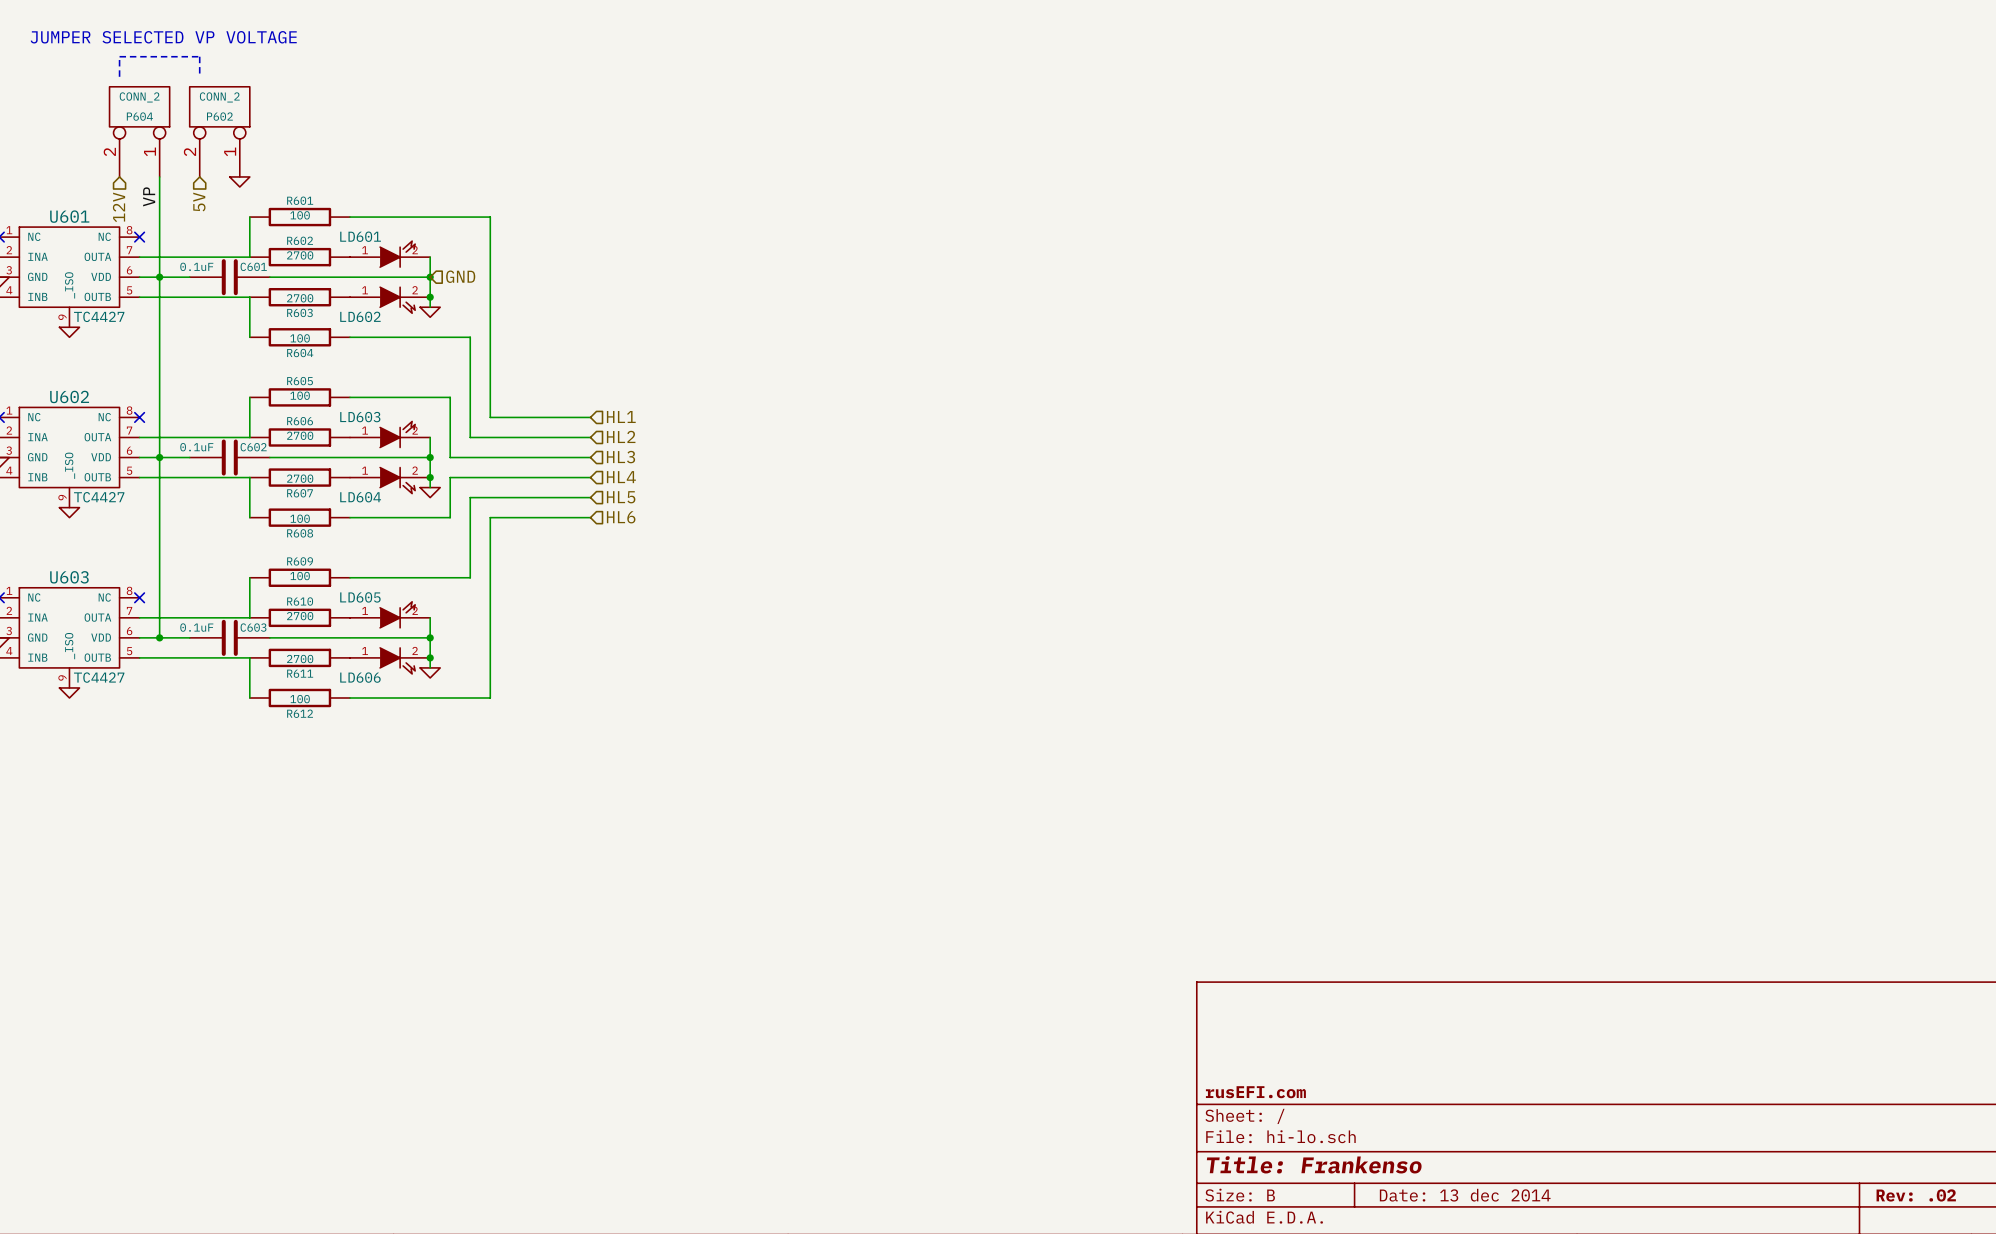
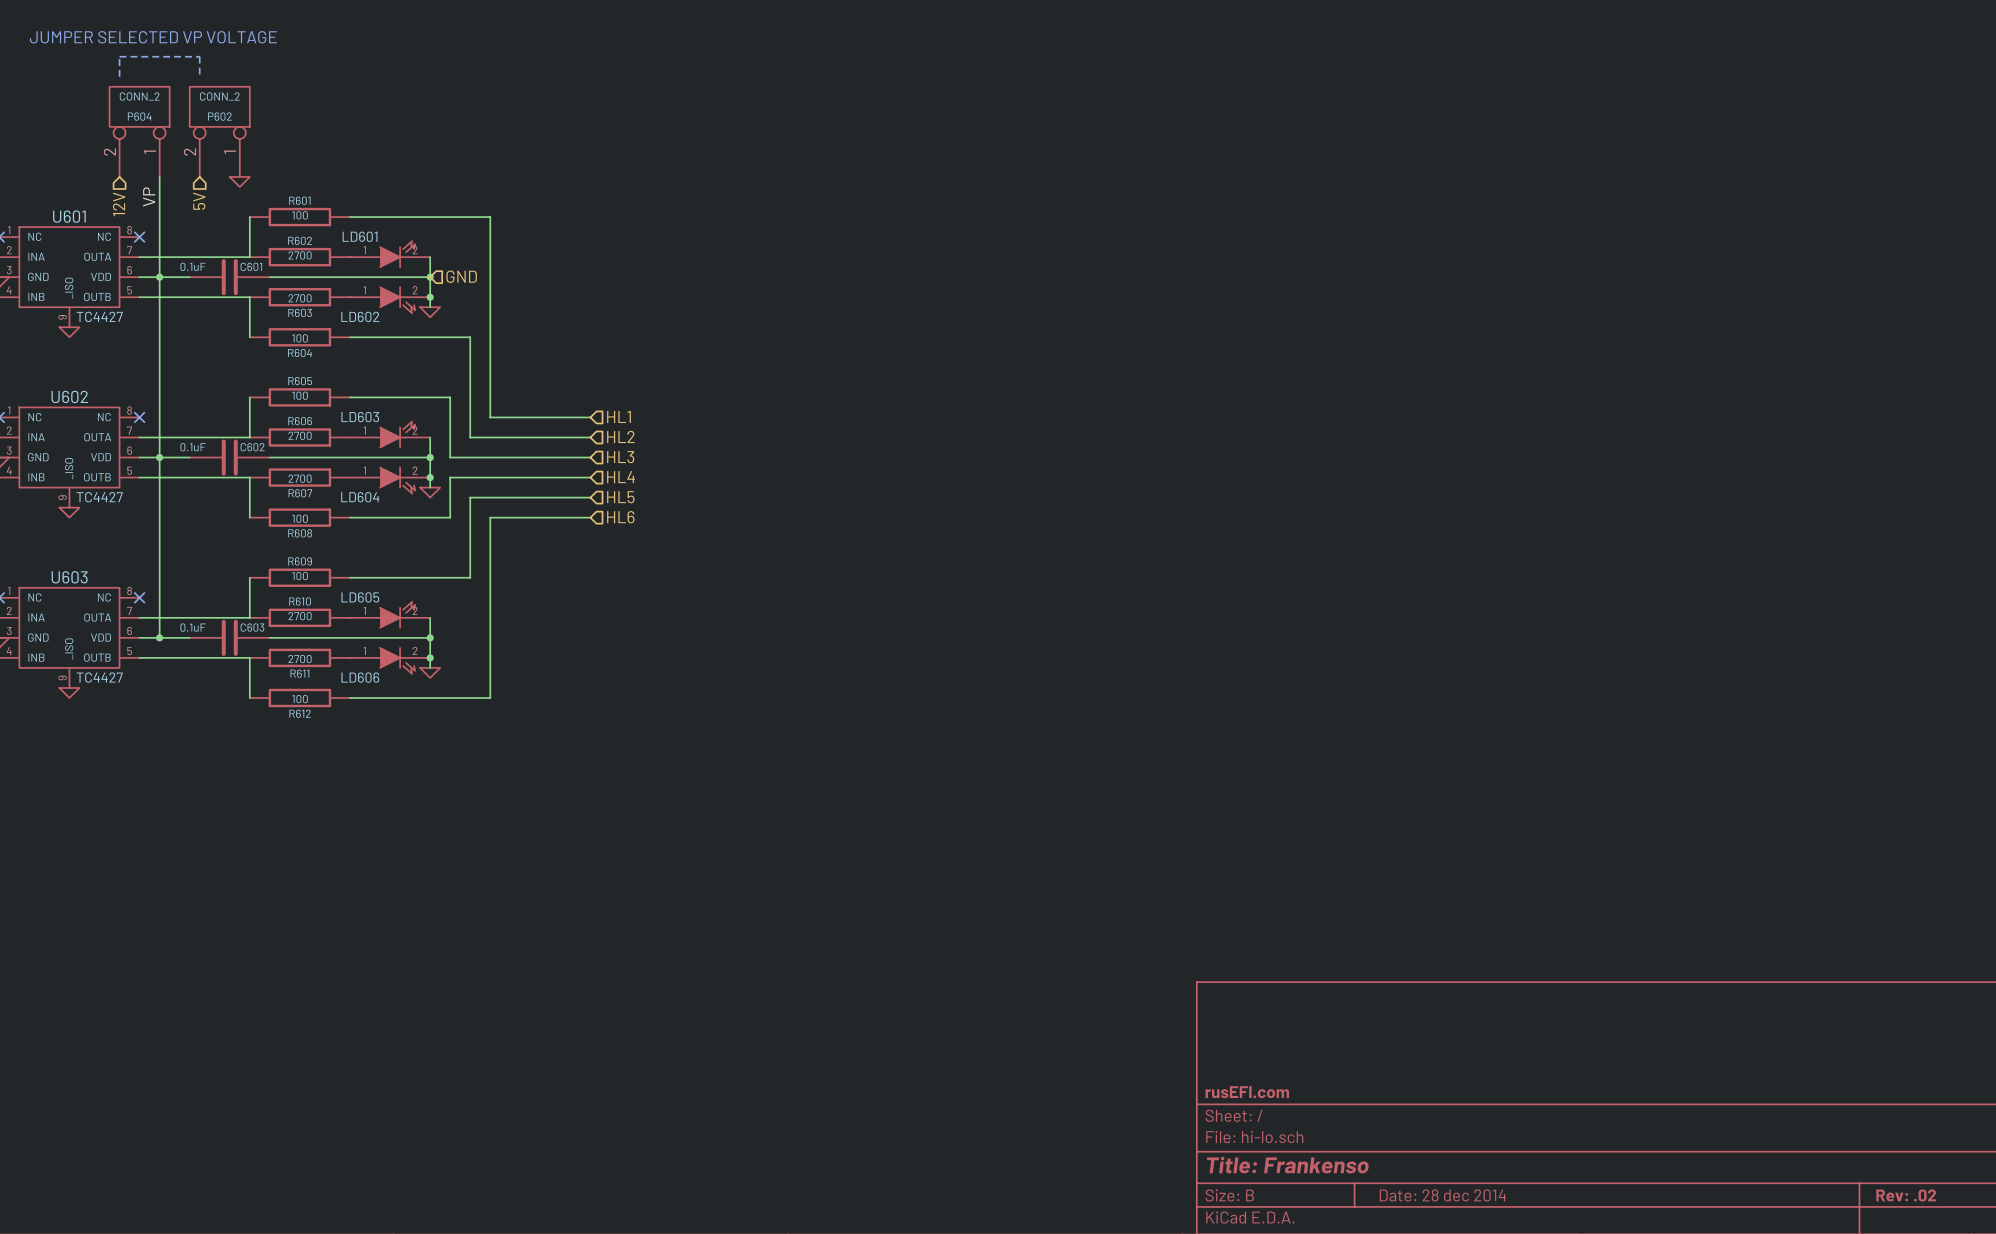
title block: Date: 13 dec 2014 (1465, 1195) -> Date: 28 dec 2014 (1442, 1195)

